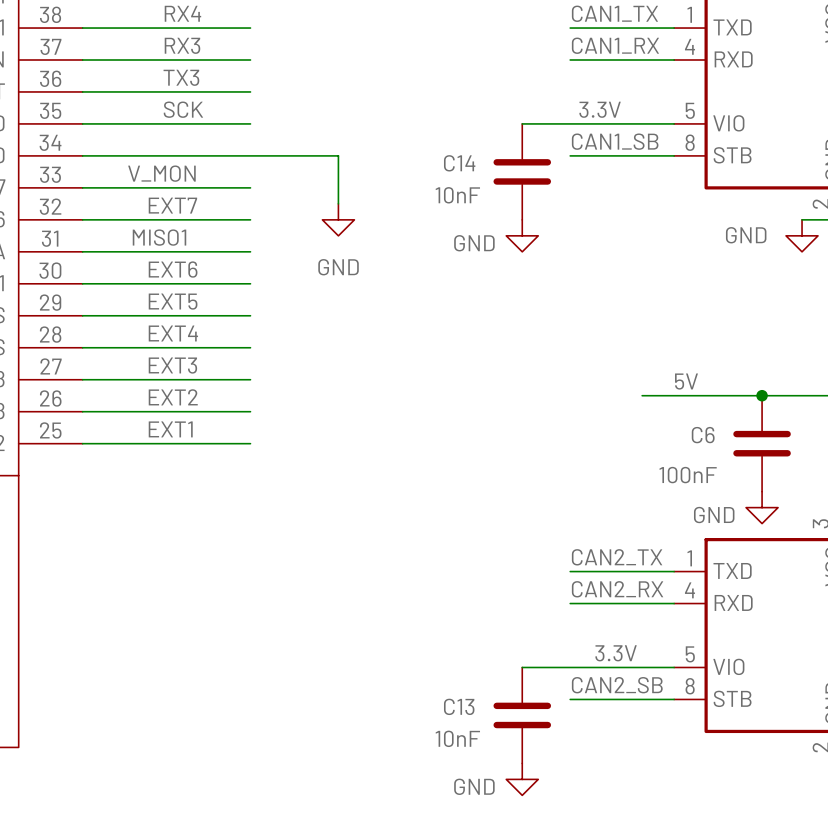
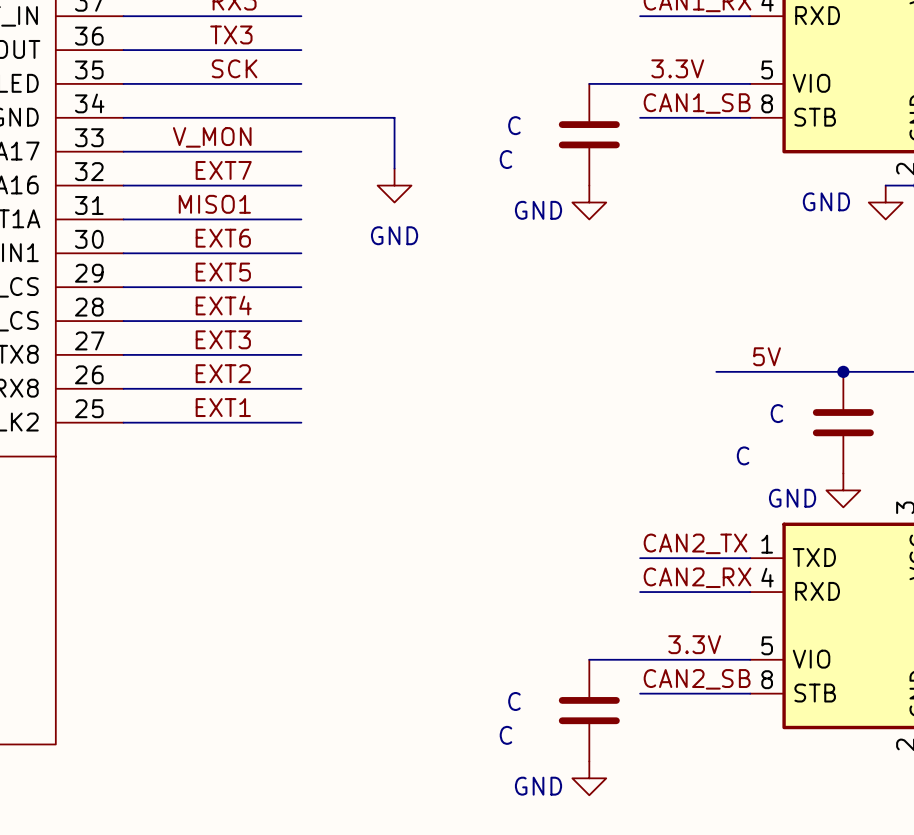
C14 name: C14 (459, 163) -> C (514, 125)
C14 value: 10nF (457, 195) -> C (505, 159)
C6 name: C6 (703, 435) -> C (776, 413)
C6 value: 100nF (688, 475) -> C (743, 455)
C13 name: C13 (459, 706) -> C (514, 701)
C13 value: 10nF (457, 738) -> C (505, 735)

